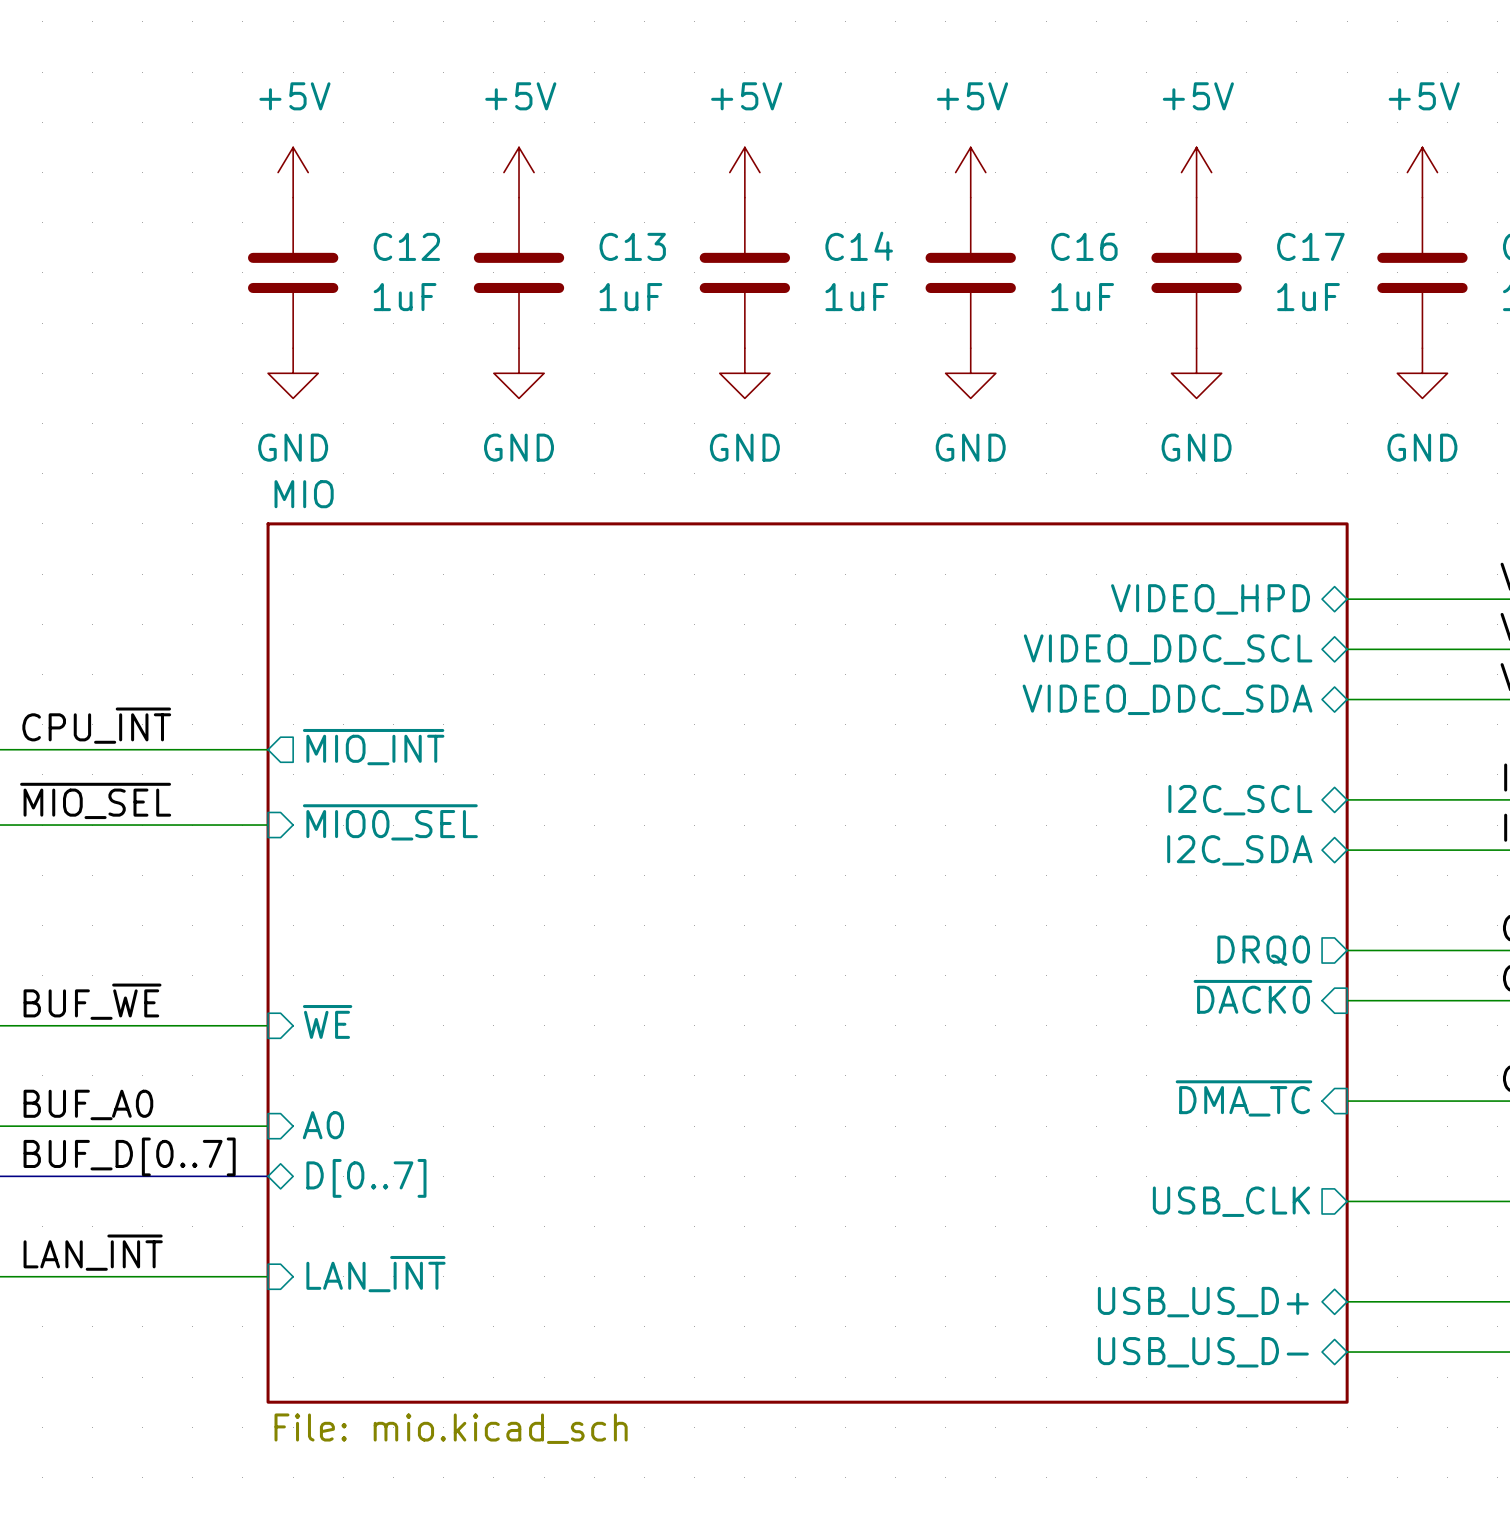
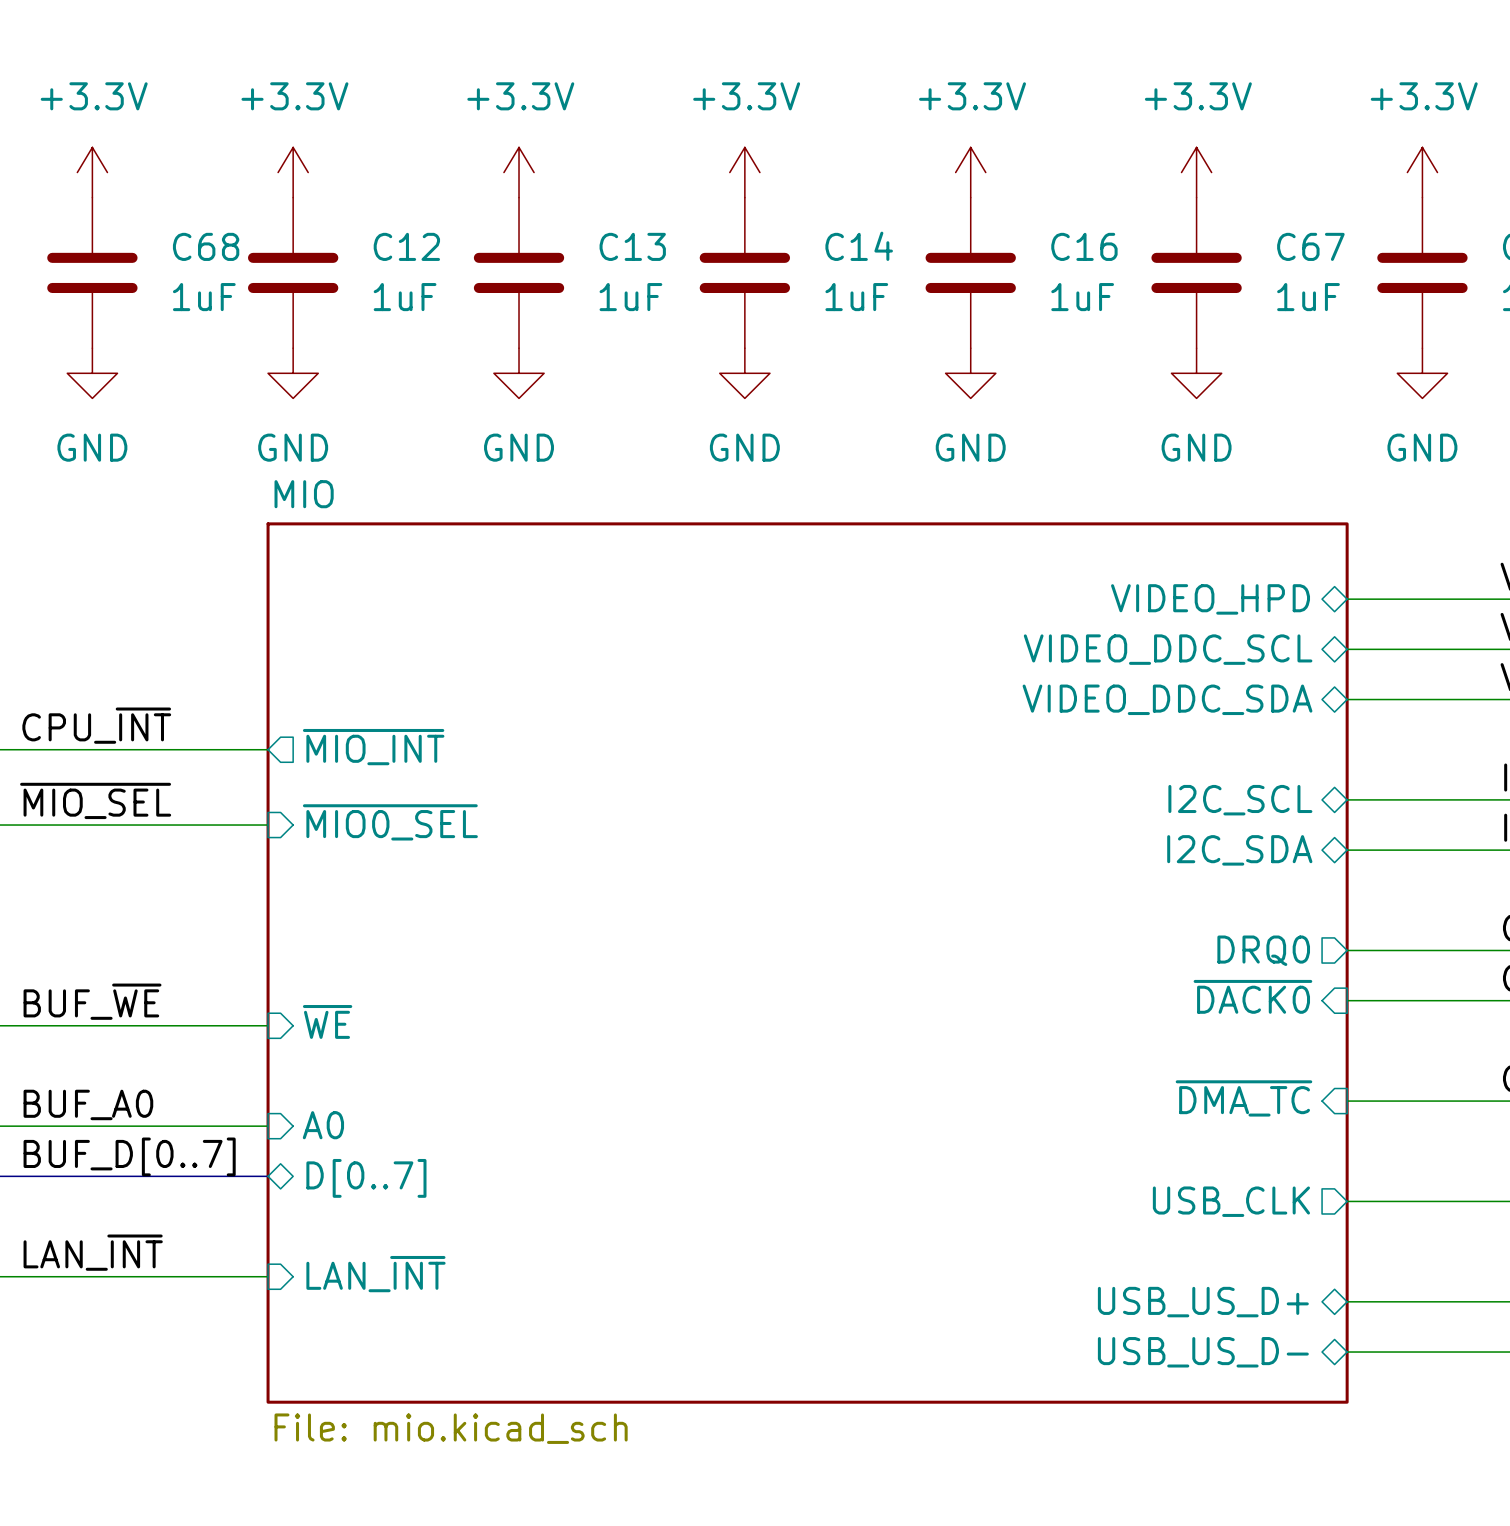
power symbol: none -> +3.3V (92, 172)
power symbol: +5V (293, 172) -> +3.3V (293, 172)
power symbol: +5V (519, 172) -> +3.3V (519, 172)
power symbol: +5V (744, 172) -> +3.3V (744, 172)
power symbol: +5V (970, 172) -> +3.3V (970, 172)
power symbol: +5V (1196, 172) -> +3.3V (1196, 172)
power symbol: +5V (1422, 172) -> +3.3V (1422, 172)
C17 name: C17 (1310, 246) -> C67 (1310, 246)
C68: none -> 1uF (92, 272)
power symbol: none -> GND (92, 373)

